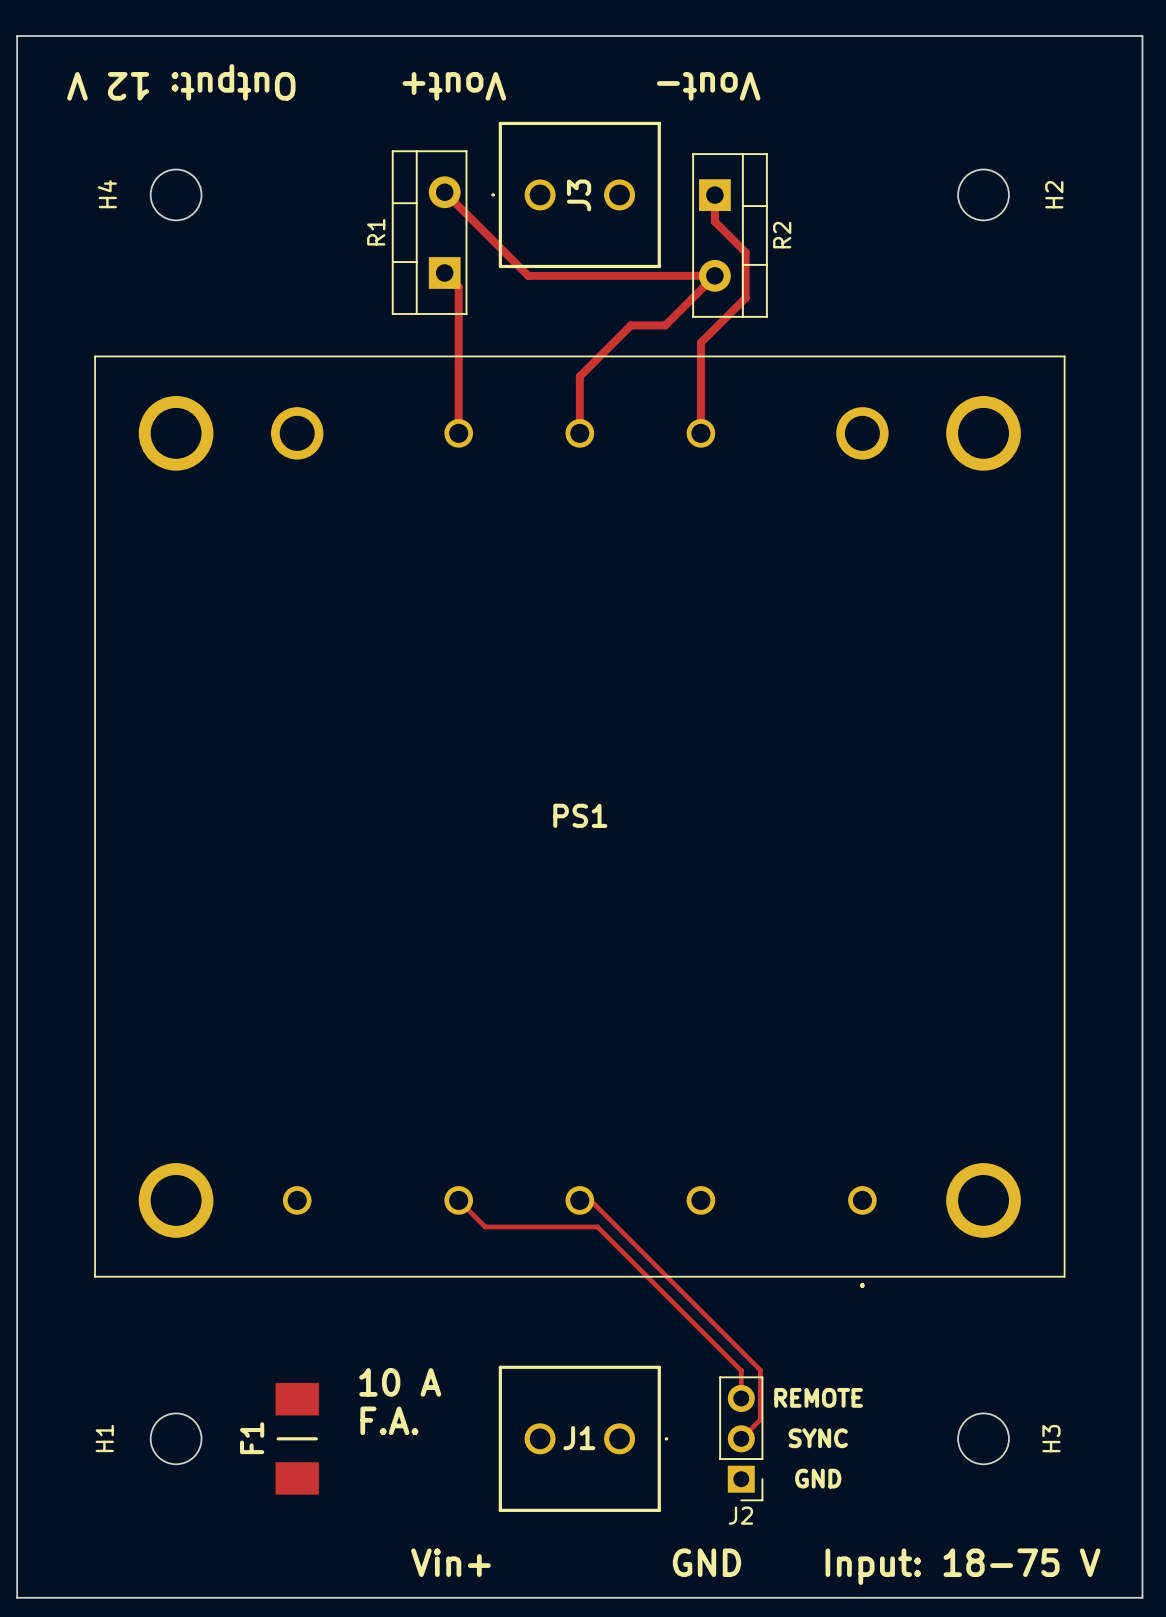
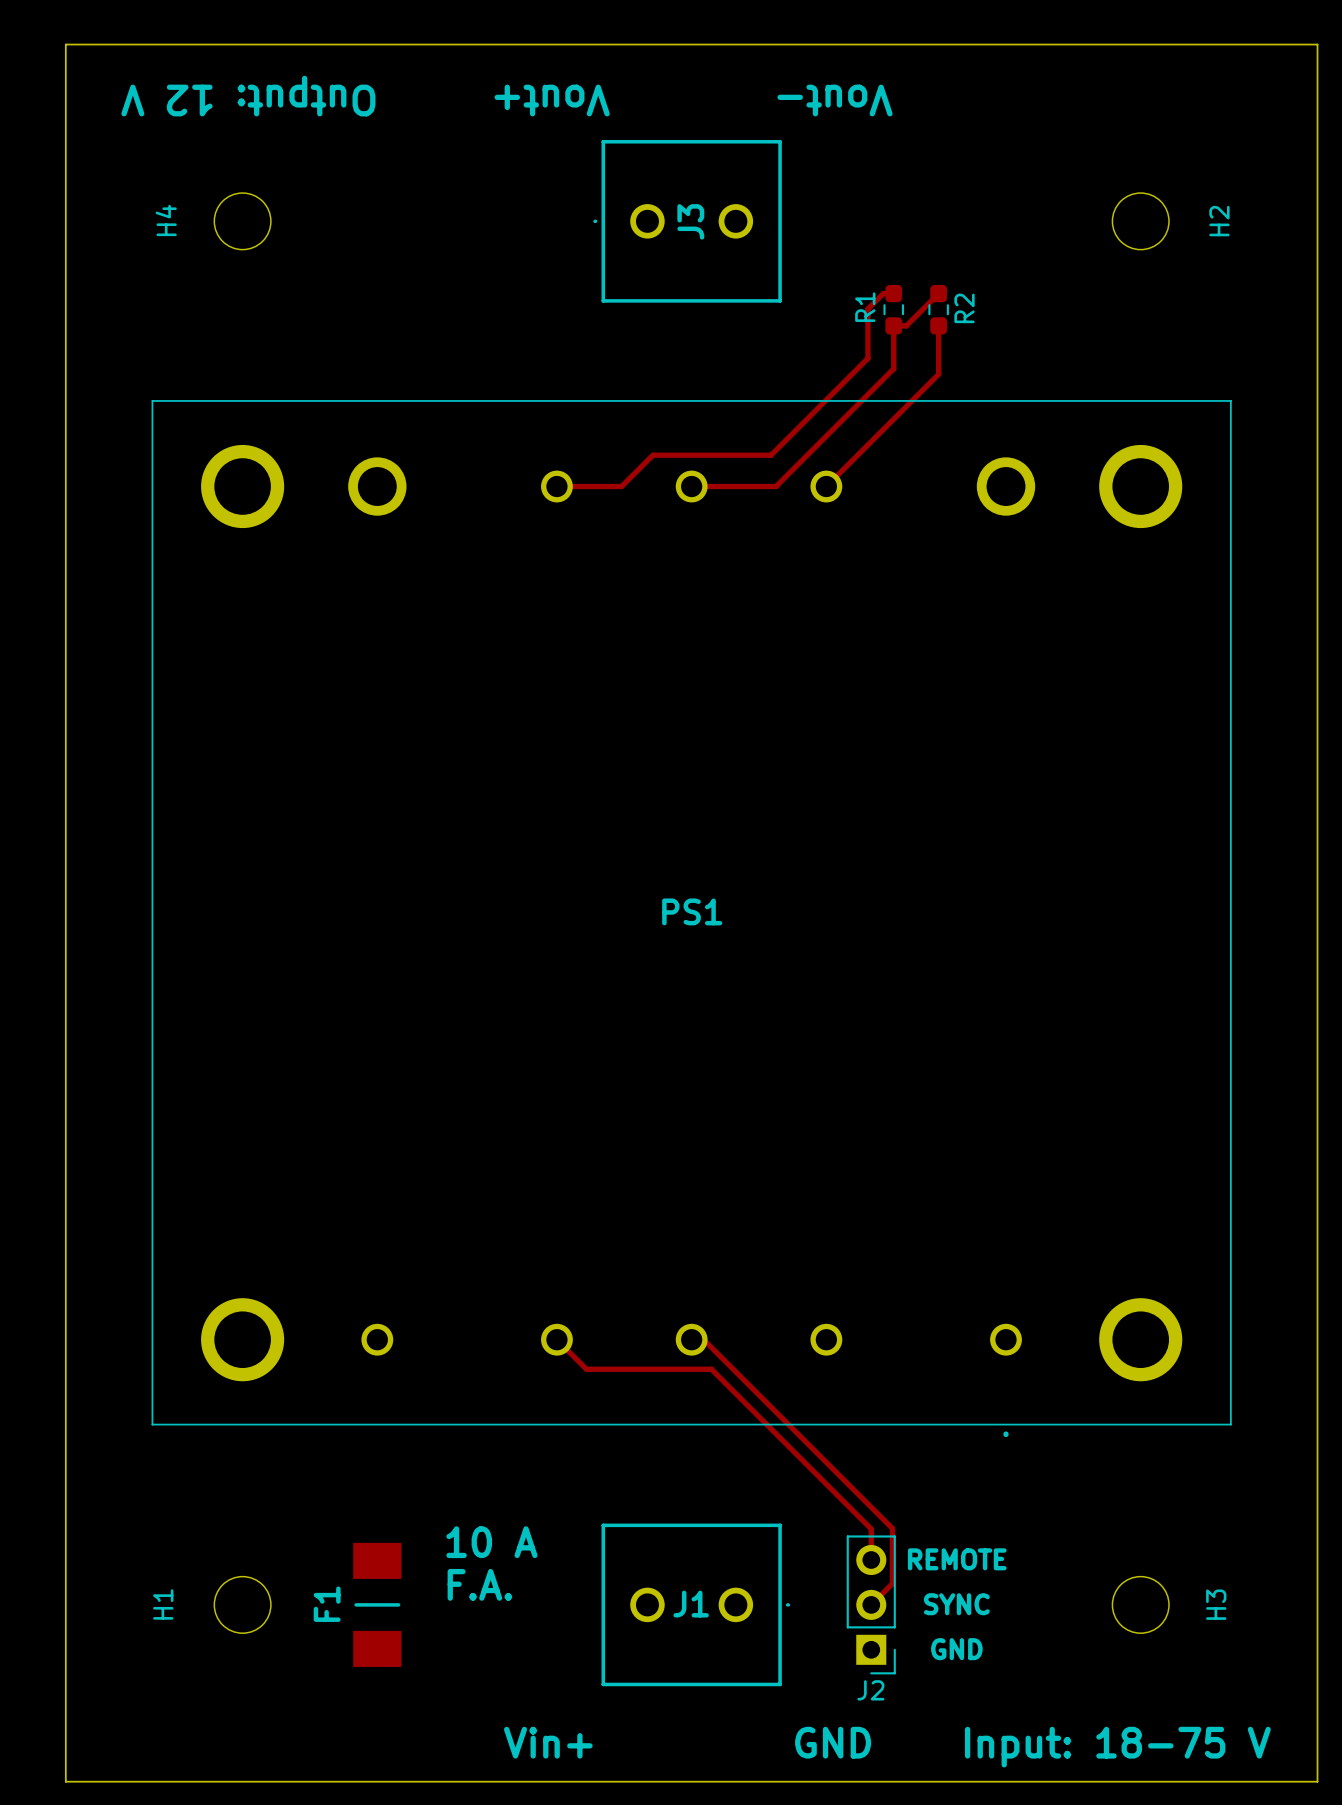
R1 footprint: [391, 150, 468, 315] -> [883, 284, 905, 335]
R2 footprint: [692, 153, 768, 318] -> [928, 284, 949, 335]
top track: (444, 192) (528, 275) (714, 275) (665, 325) (630, 325) (579, 376) (579, 433) -> (938, 293) (906, 325) (893, 325) (893, 368) (775, 486) (691, 486)
top track: (714, 195) (714, 221) (745, 252) (745, 298) (700, 342) (700, 433) -> (938, 325) (938, 374) (826, 486)
top track: (444, 272) (458, 286) (458, 433) -> (893, 293) (883, 293) (867, 309) (867, 358) (771, 455) (652, 455) (621, 486) (556, 486)

